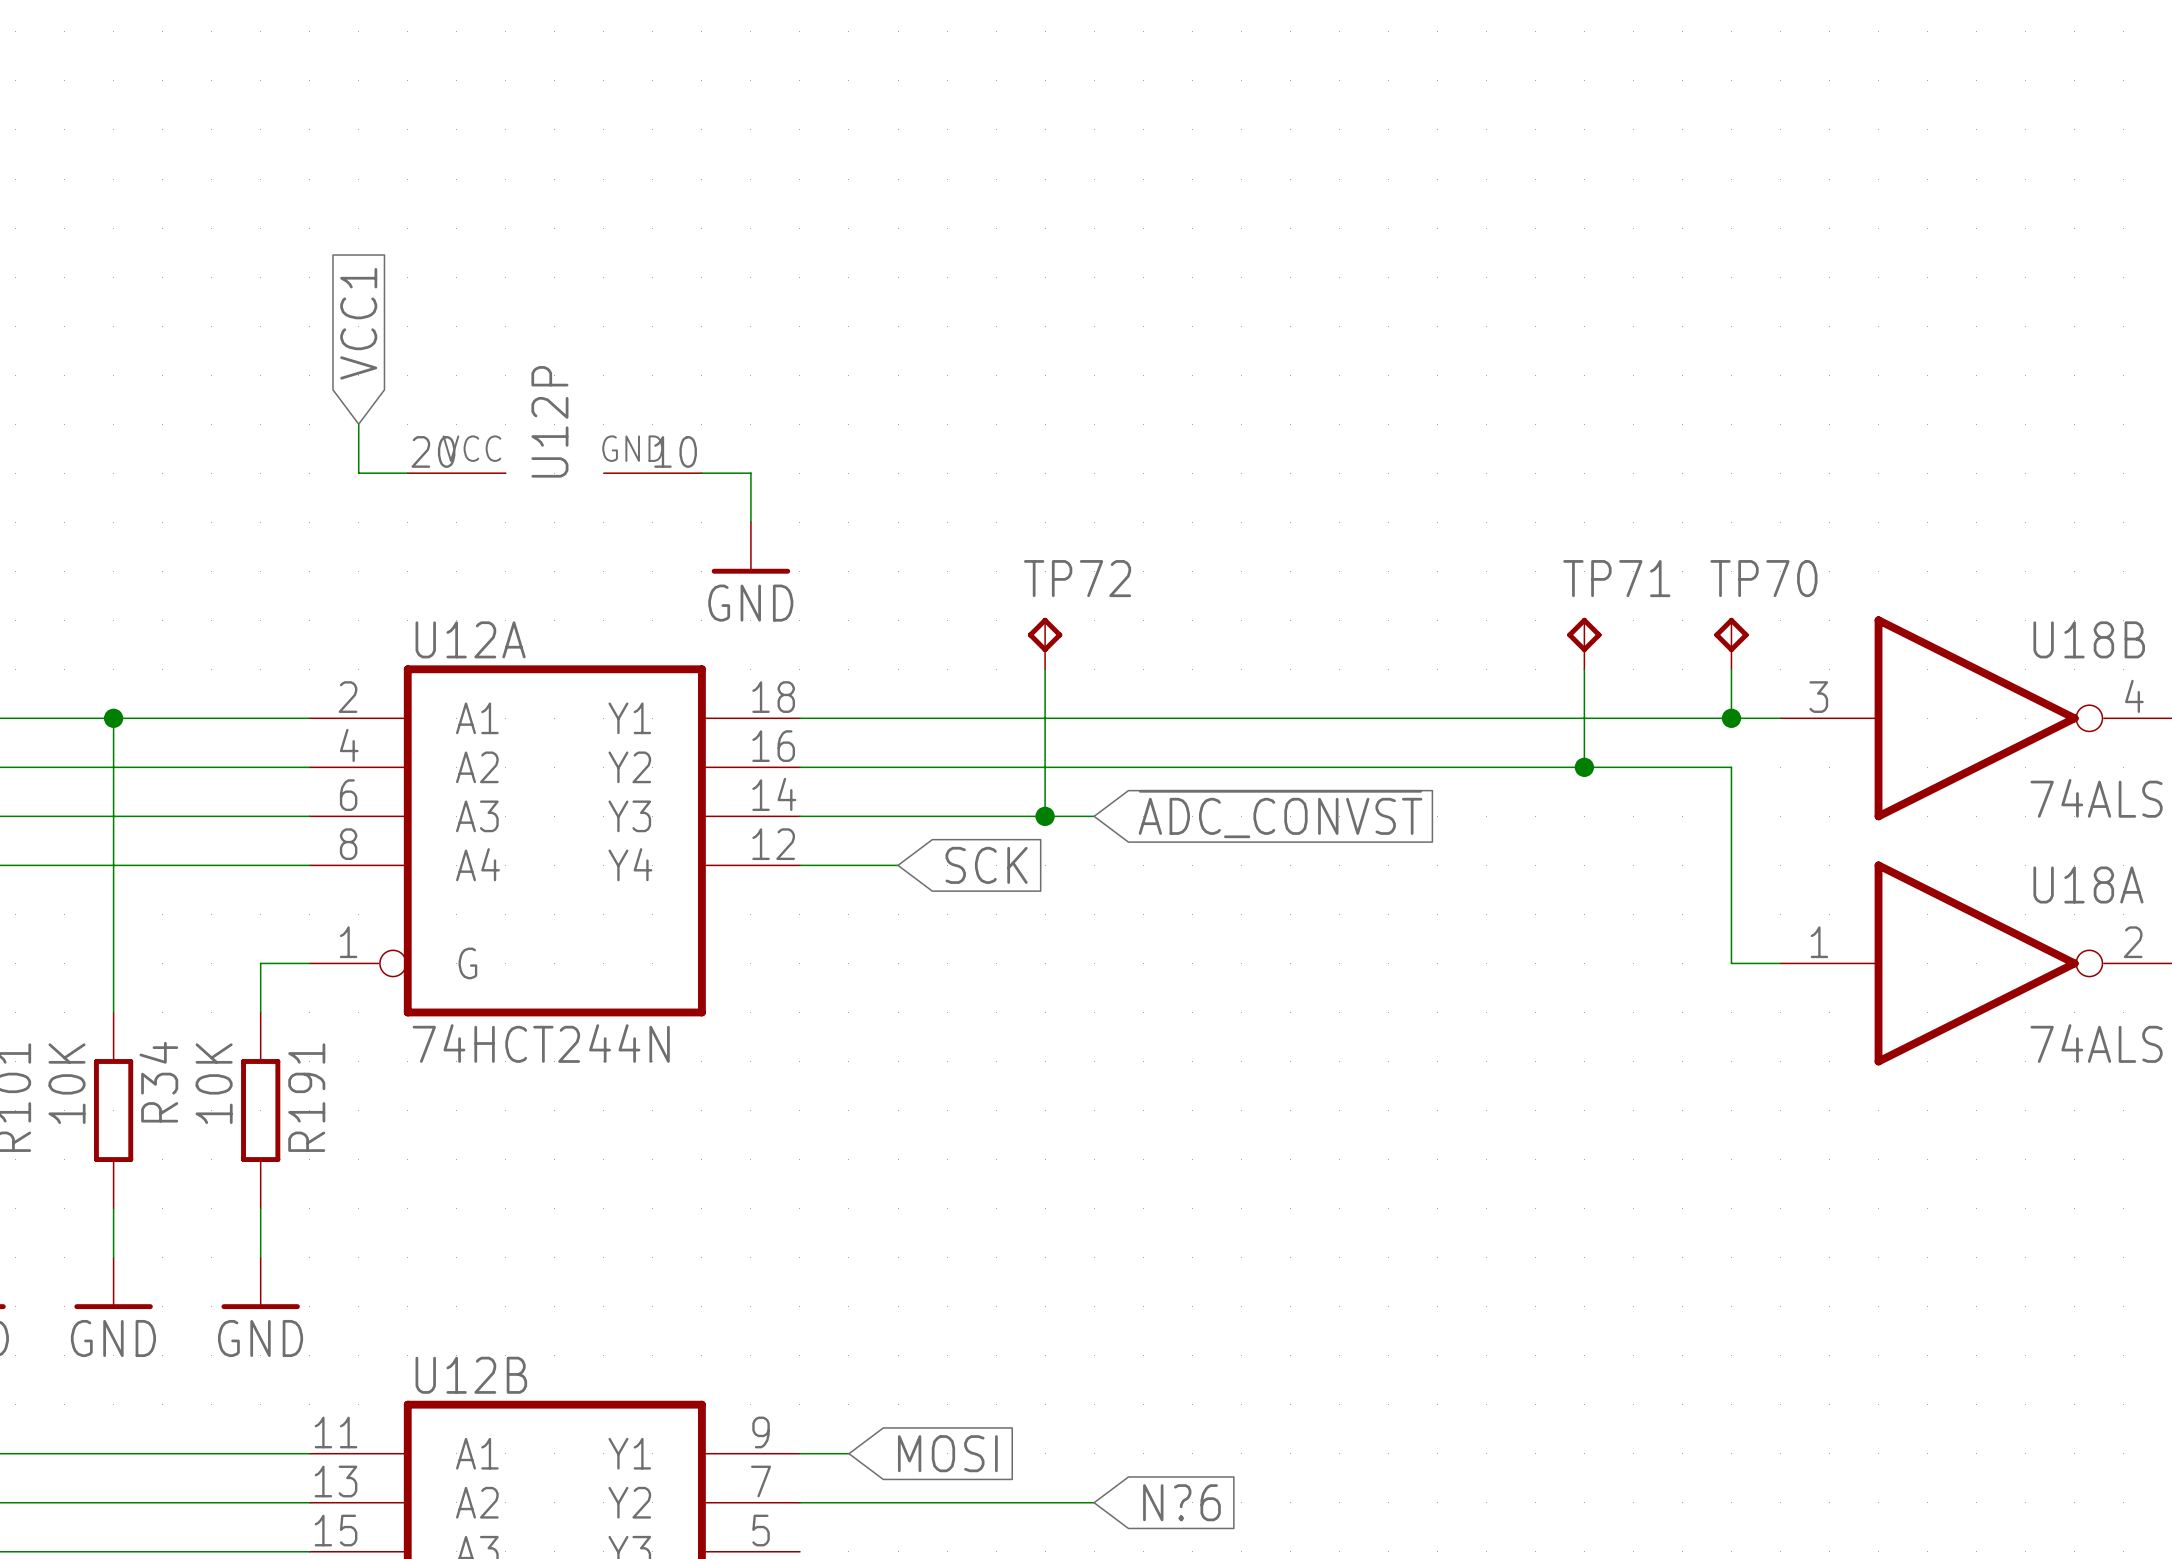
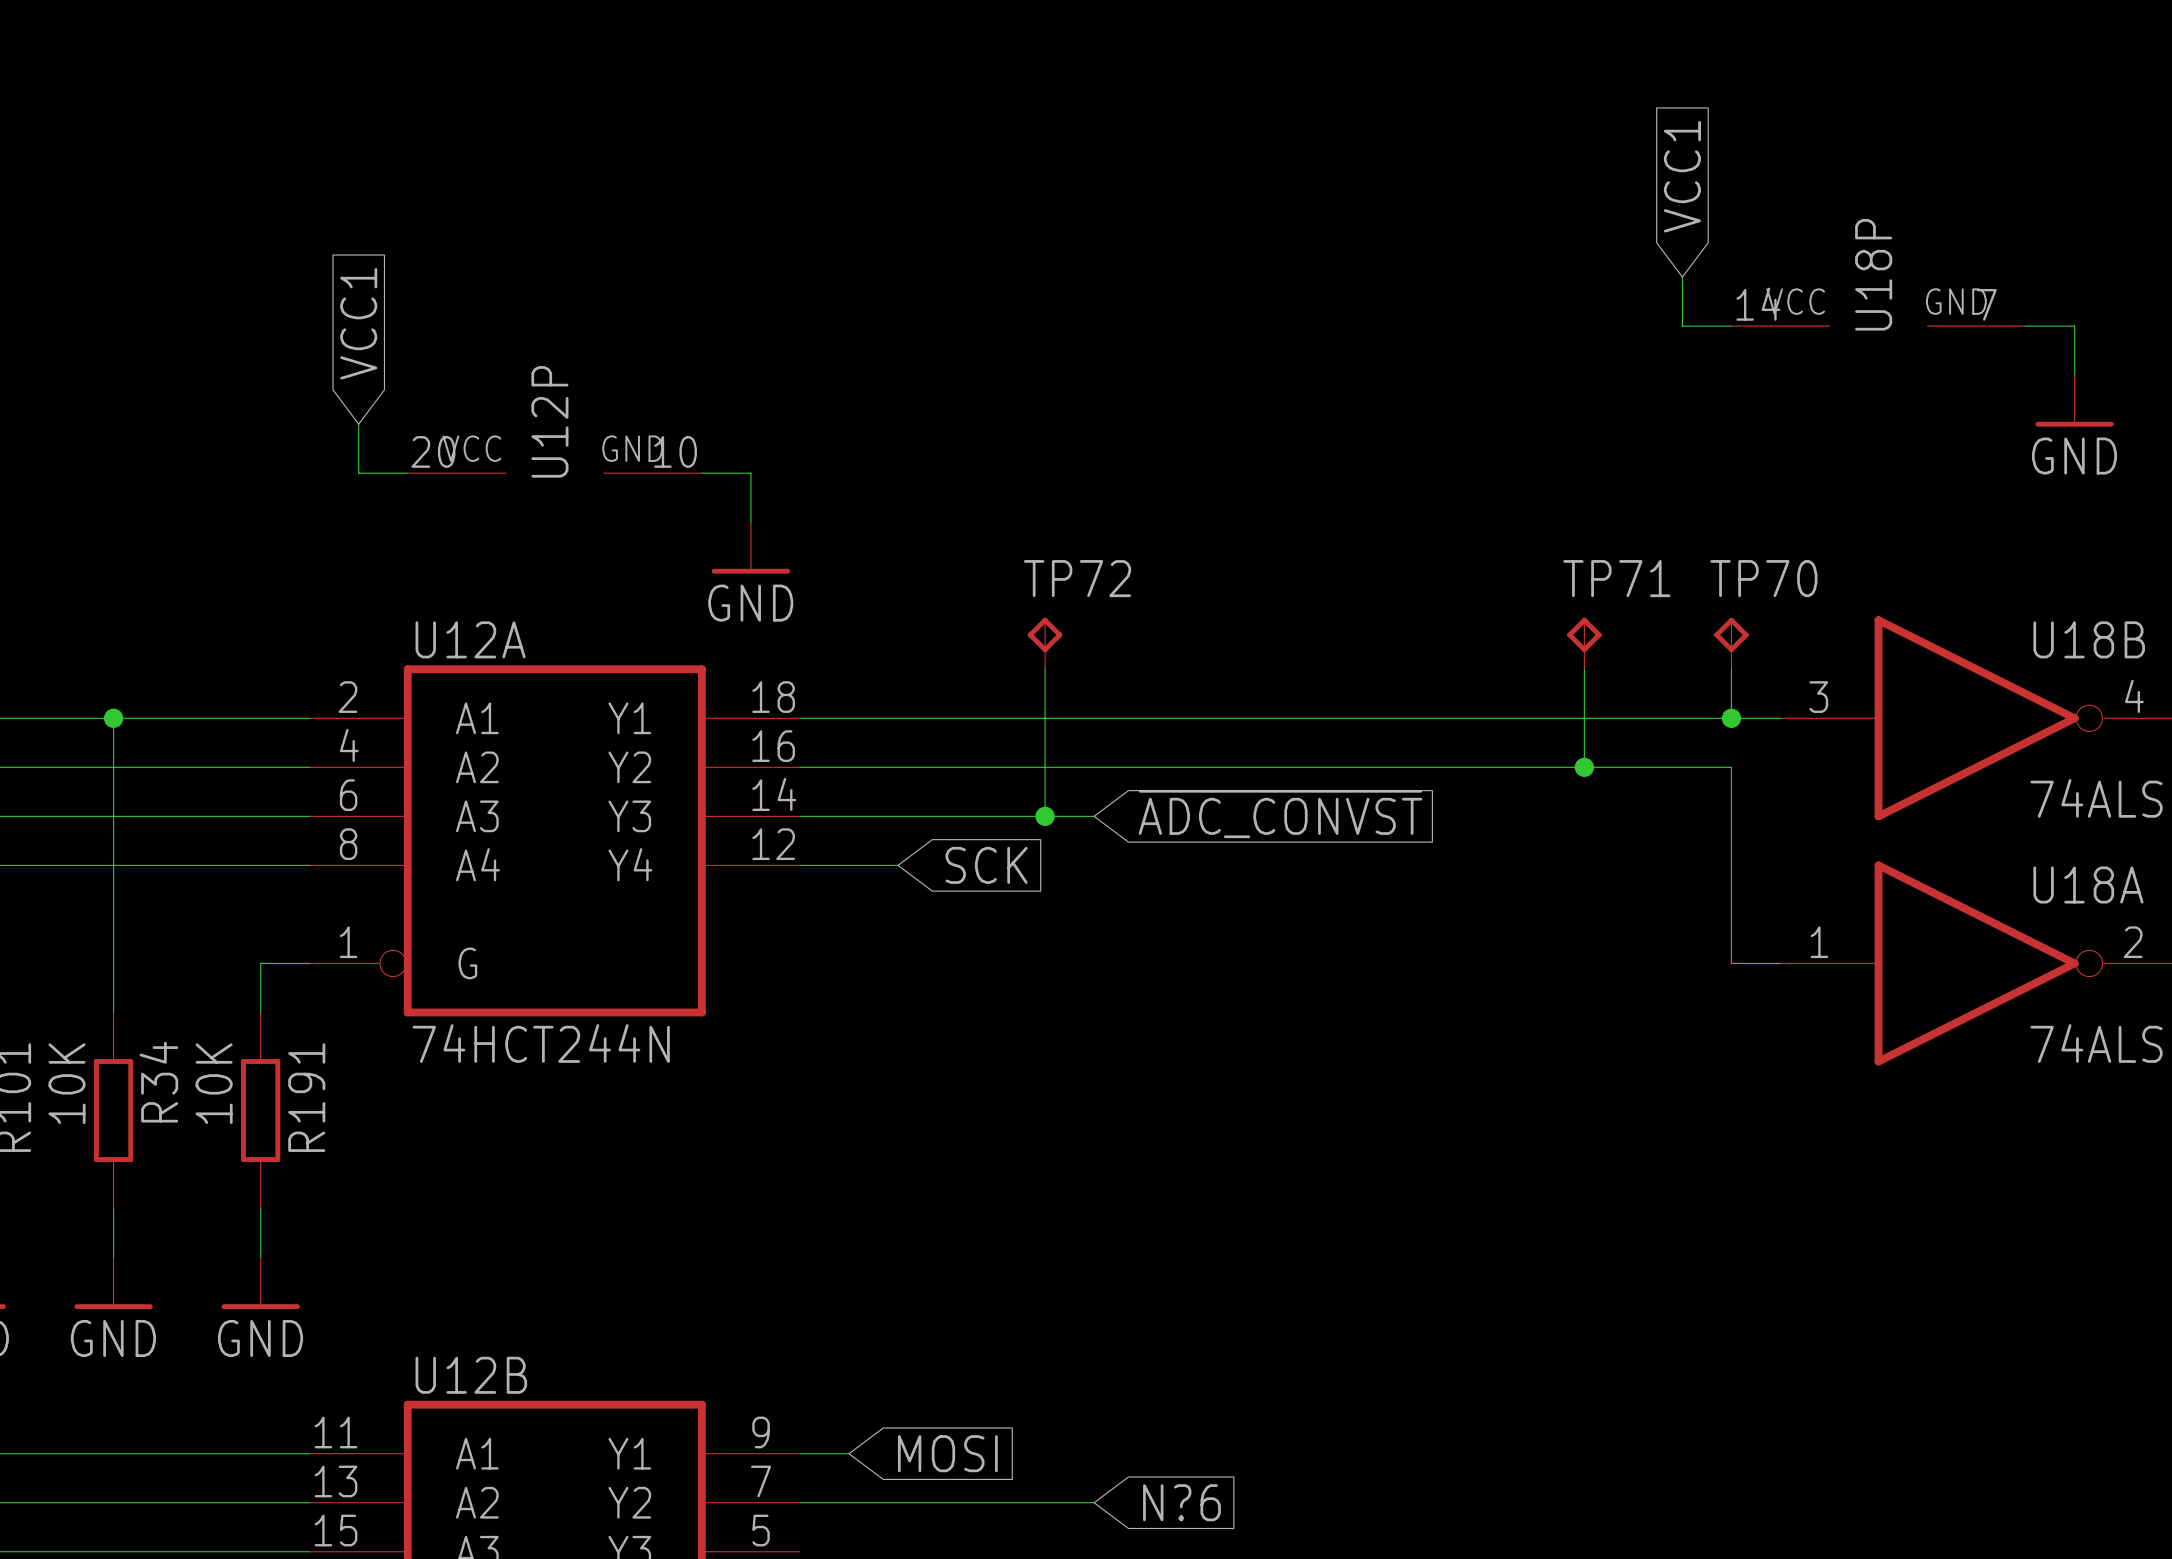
global label: none -> VCC1 (1682, 176)
wire: none -> (1682, 277) (1682, 326) (1731, 326)
U18P: none -> (1878, 326)
wire: none -> (2025, 326) (2074, 326) (2074, 375)
power symbol: none -> GND (2074, 400)

